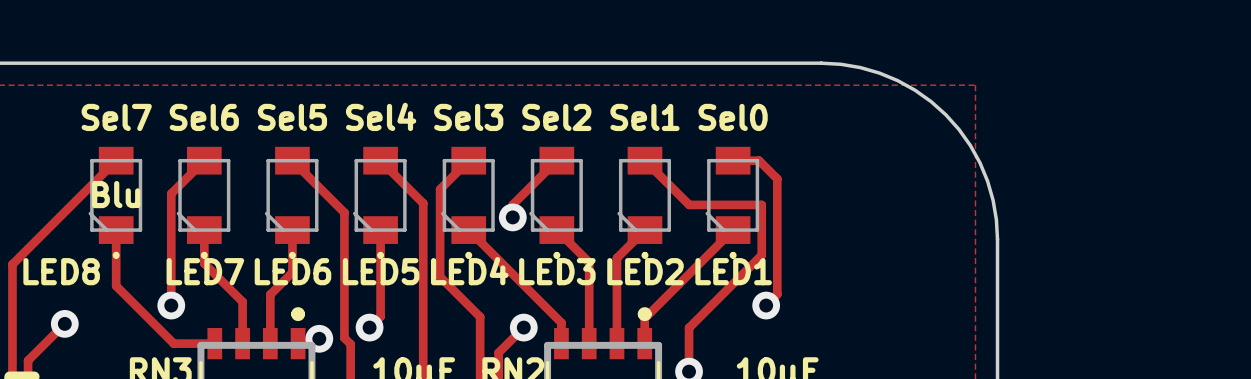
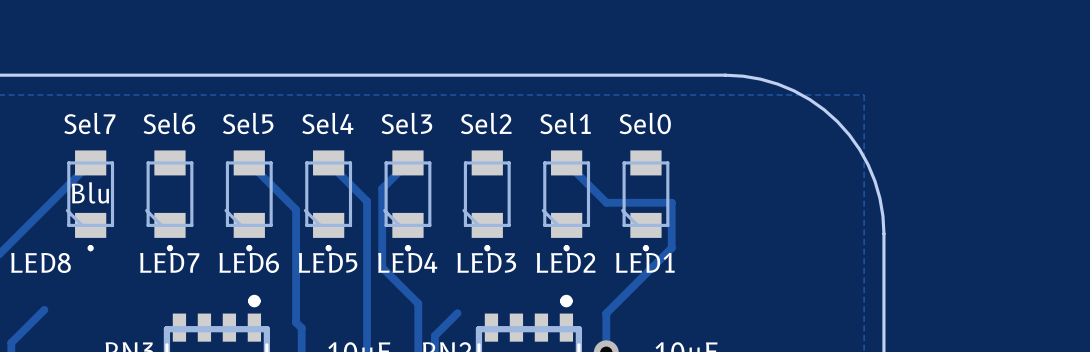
track: (204, 160) (171, 193) (171, 305) -> none
track: (556, 160) (512, 204) (512, 217) -> none
track: (733, 160) (759, 160) (777, 178) (777, 294) (766, 305) -> none
via: (512, 217) -> none
track: (116, 230) (116, 286) (173, 343) (214, 343) -> none
track: (204, 230) (204, 263) (242, 301) (242, 343) -> none
track: (292, 230) (292, 272) (270, 294) (270, 343) -> none
track: (380, 230) (380, 316) (369, 327) -> none
track: (468, 230) (561, 322) (561, 343) -> none
track: (556, 230) (589, 262) (589, 343) -> none
track: (644, 230) (616, 258) (616, 343) -> none
track: (733, 230) (644, 318) (644, 343) -> none
via: (171, 305) -> none
via: (766, 305) -> none
via: (64, 323) -> none
via: (369, 327) -> none
via: (523, 327) -> none
via: (319, 338) -> none

